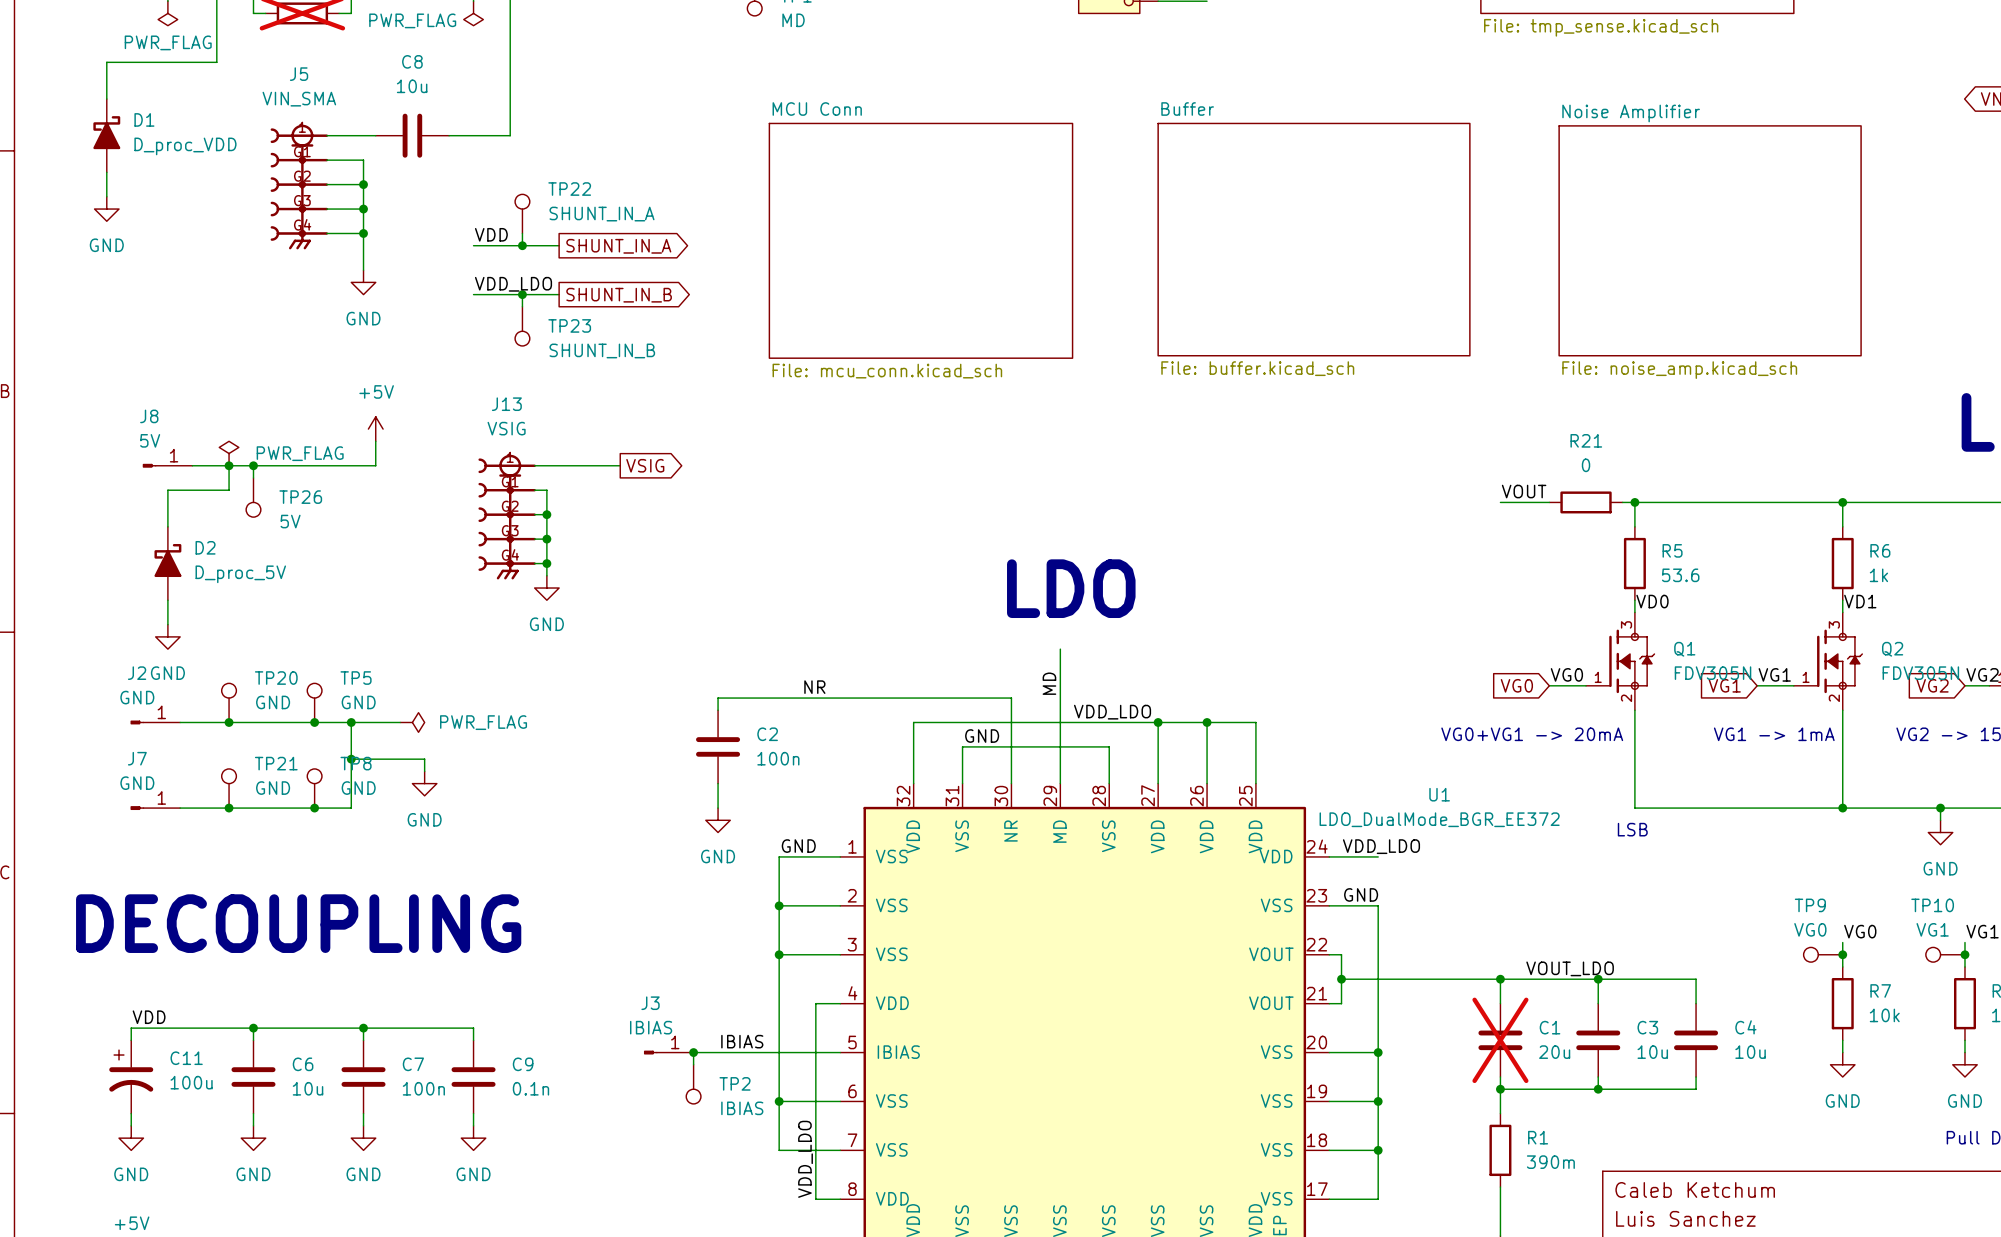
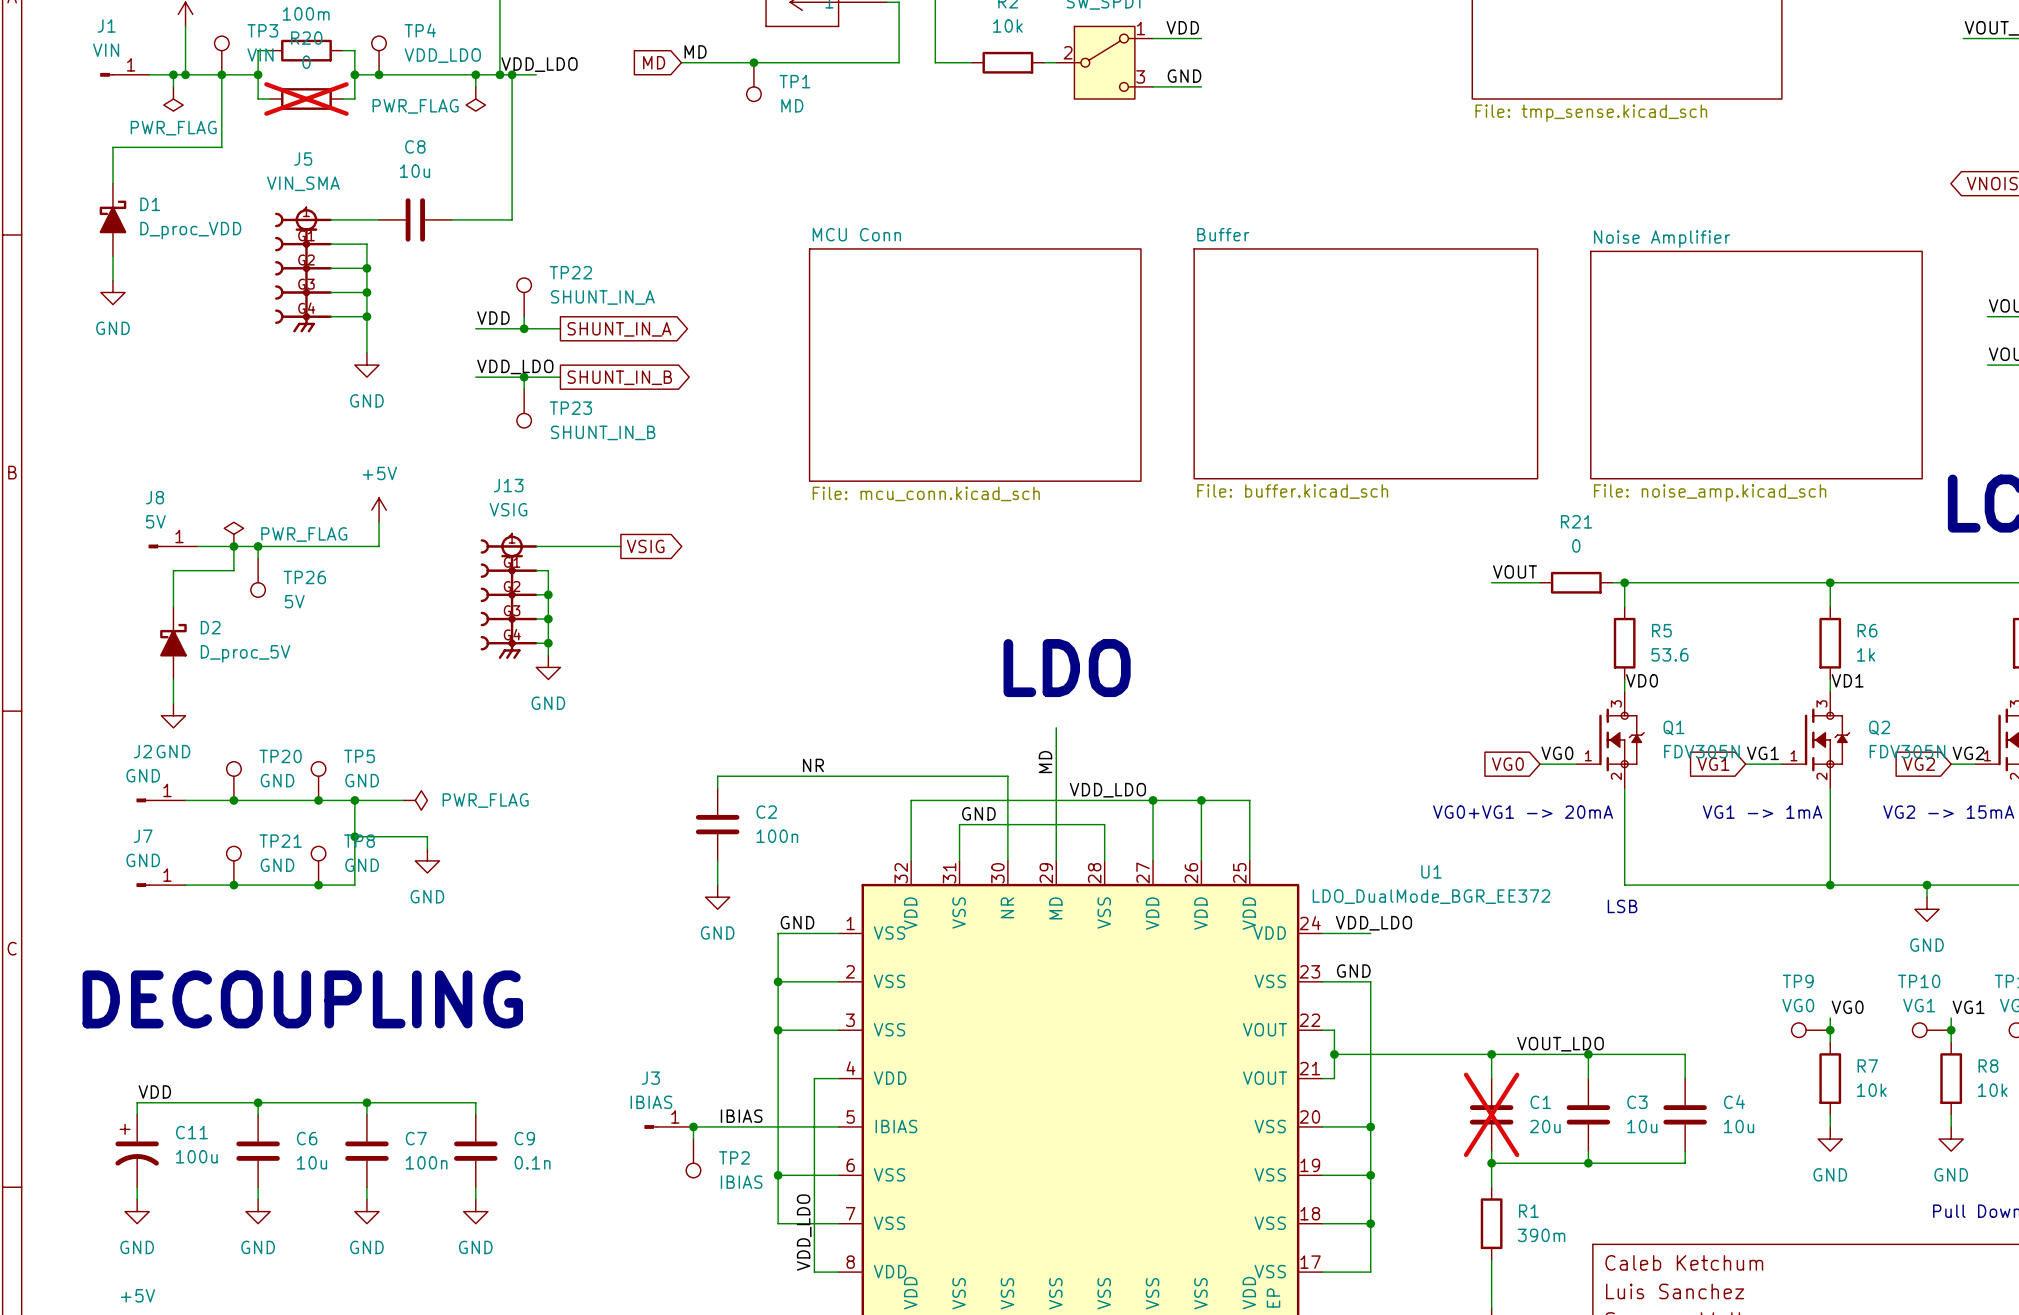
sheet Buffer: File: buffer.kicad_sch (1314, 239) -> none
sheet MCU Conn: File: mcu_conn.kicad_sch (920, 240) -> none
sheet Noise Amplifier: File: noise_amp.kicad_sch (1710, 240) -> none
sheet Buffer: none -> File: buffer.kicad_sch (1365, 363)
sheet MCU Conn: none -> File: mcu_conn.kicad_sch (975, 365)
sheet Noise Amplifier: none -> File: noise_amp.kicad_sch (1756, 365)

